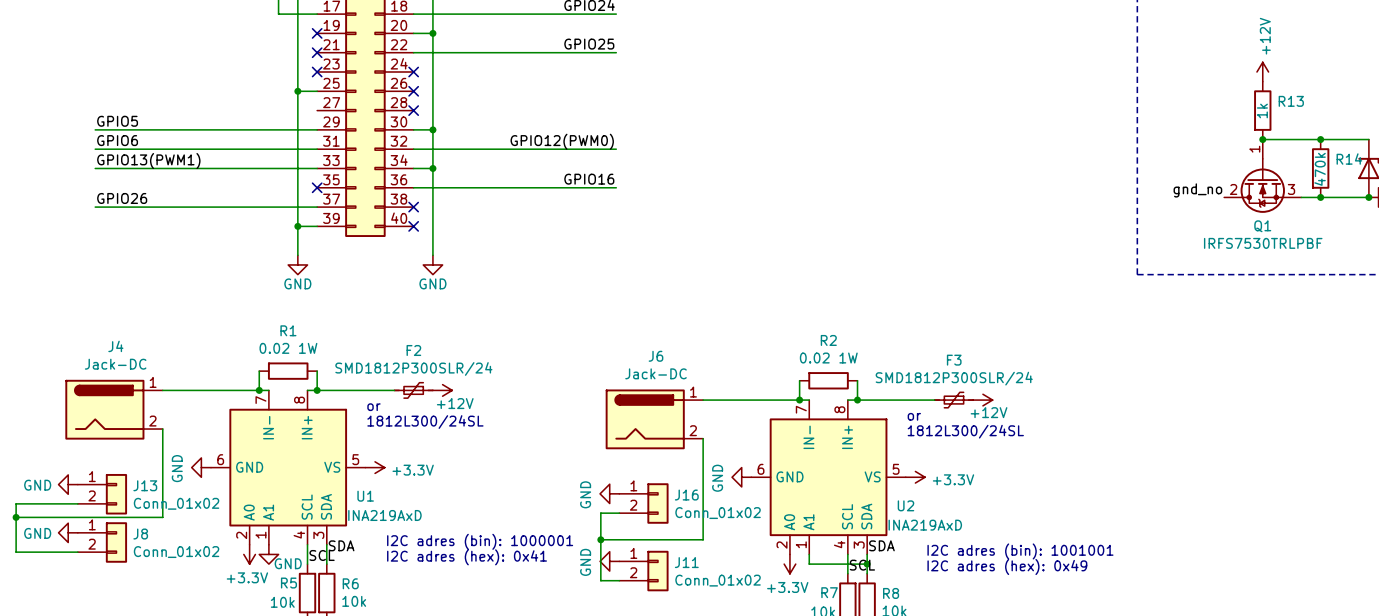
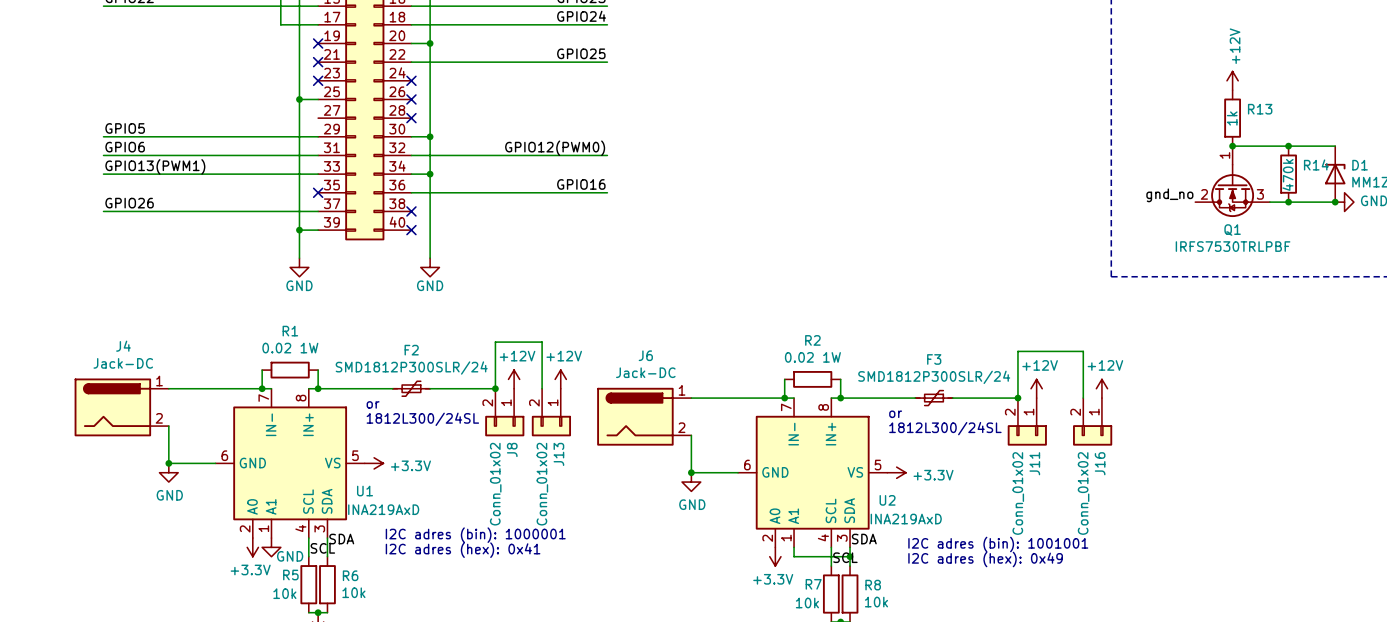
power symbol: none -> +12V (514, 379)
power symbol: none -> +12V (560, 379)
wire: none -> (430, 388) (495, 388) (495, 342) (542, 342) (542, 388)
power symbol: +12V (442, 390) -> none
junction: none -> (495, 388)
power symbol: none -> +12V (1036, 388)
power symbol: none -> +12V (1101, 388)
wire: none -> (952, 398) (1017, 398) (1017, 351) (1083, 351) (1083, 398)
power symbol: +12V (982, 400) -> none
junction: none -> (1017, 398)
wire: (162, 467) (162, 517) (16, 517) -> (168, 463) (215, 463)
junction: none -> (168, 463)
power symbol rotation: 0° (201, 467) -> 90° counterclockwise (168, 472)
power symbol position: GND (201, 467) -> GND (168, 472)
wire: (703, 477) (703, 539) (600, 539) -> (691, 472) (738, 472)
junction: none -> (691, 472)
power symbol rotation: 0° (741, 477) -> 90° counterclockwise (691, 482)
power symbol position: GND (741, 477) -> GND (691, 482)
power symbol: GND (68, 484) -> none
power symbol: GND (609, 493) -> none
J13 position: (102, 494) -> (551, 412)
J13 rotation: 0° (116, 494) -> 90° clockwise (551, 426)
wire: (77, 503) (16, 503) (16, 552) (77, 552) -> none
J16 position: (643, 503) -> (1092, 421)
J16 rotation: 0° (657, 503) -> 90° clockwise (1092, 435)
wire: (619, 513) (600, 513) (600, 580) (619, 580) -> none
junction: (16, 517) -> none
power symbol: GND (68, 532) -> none
junction: (600, 539) -> none
J8 position: (102, 542) -> (504, 412)
J8 rotation: 0° (116, 542) -> 90° clockwise (504, 426)
power symbol: GND (609, 561) -> none
J11 position: (643, 571) -> (1027, 421)
J11 rotation: 0° (657, 571) -> 90° clockwise (1027, 435)

